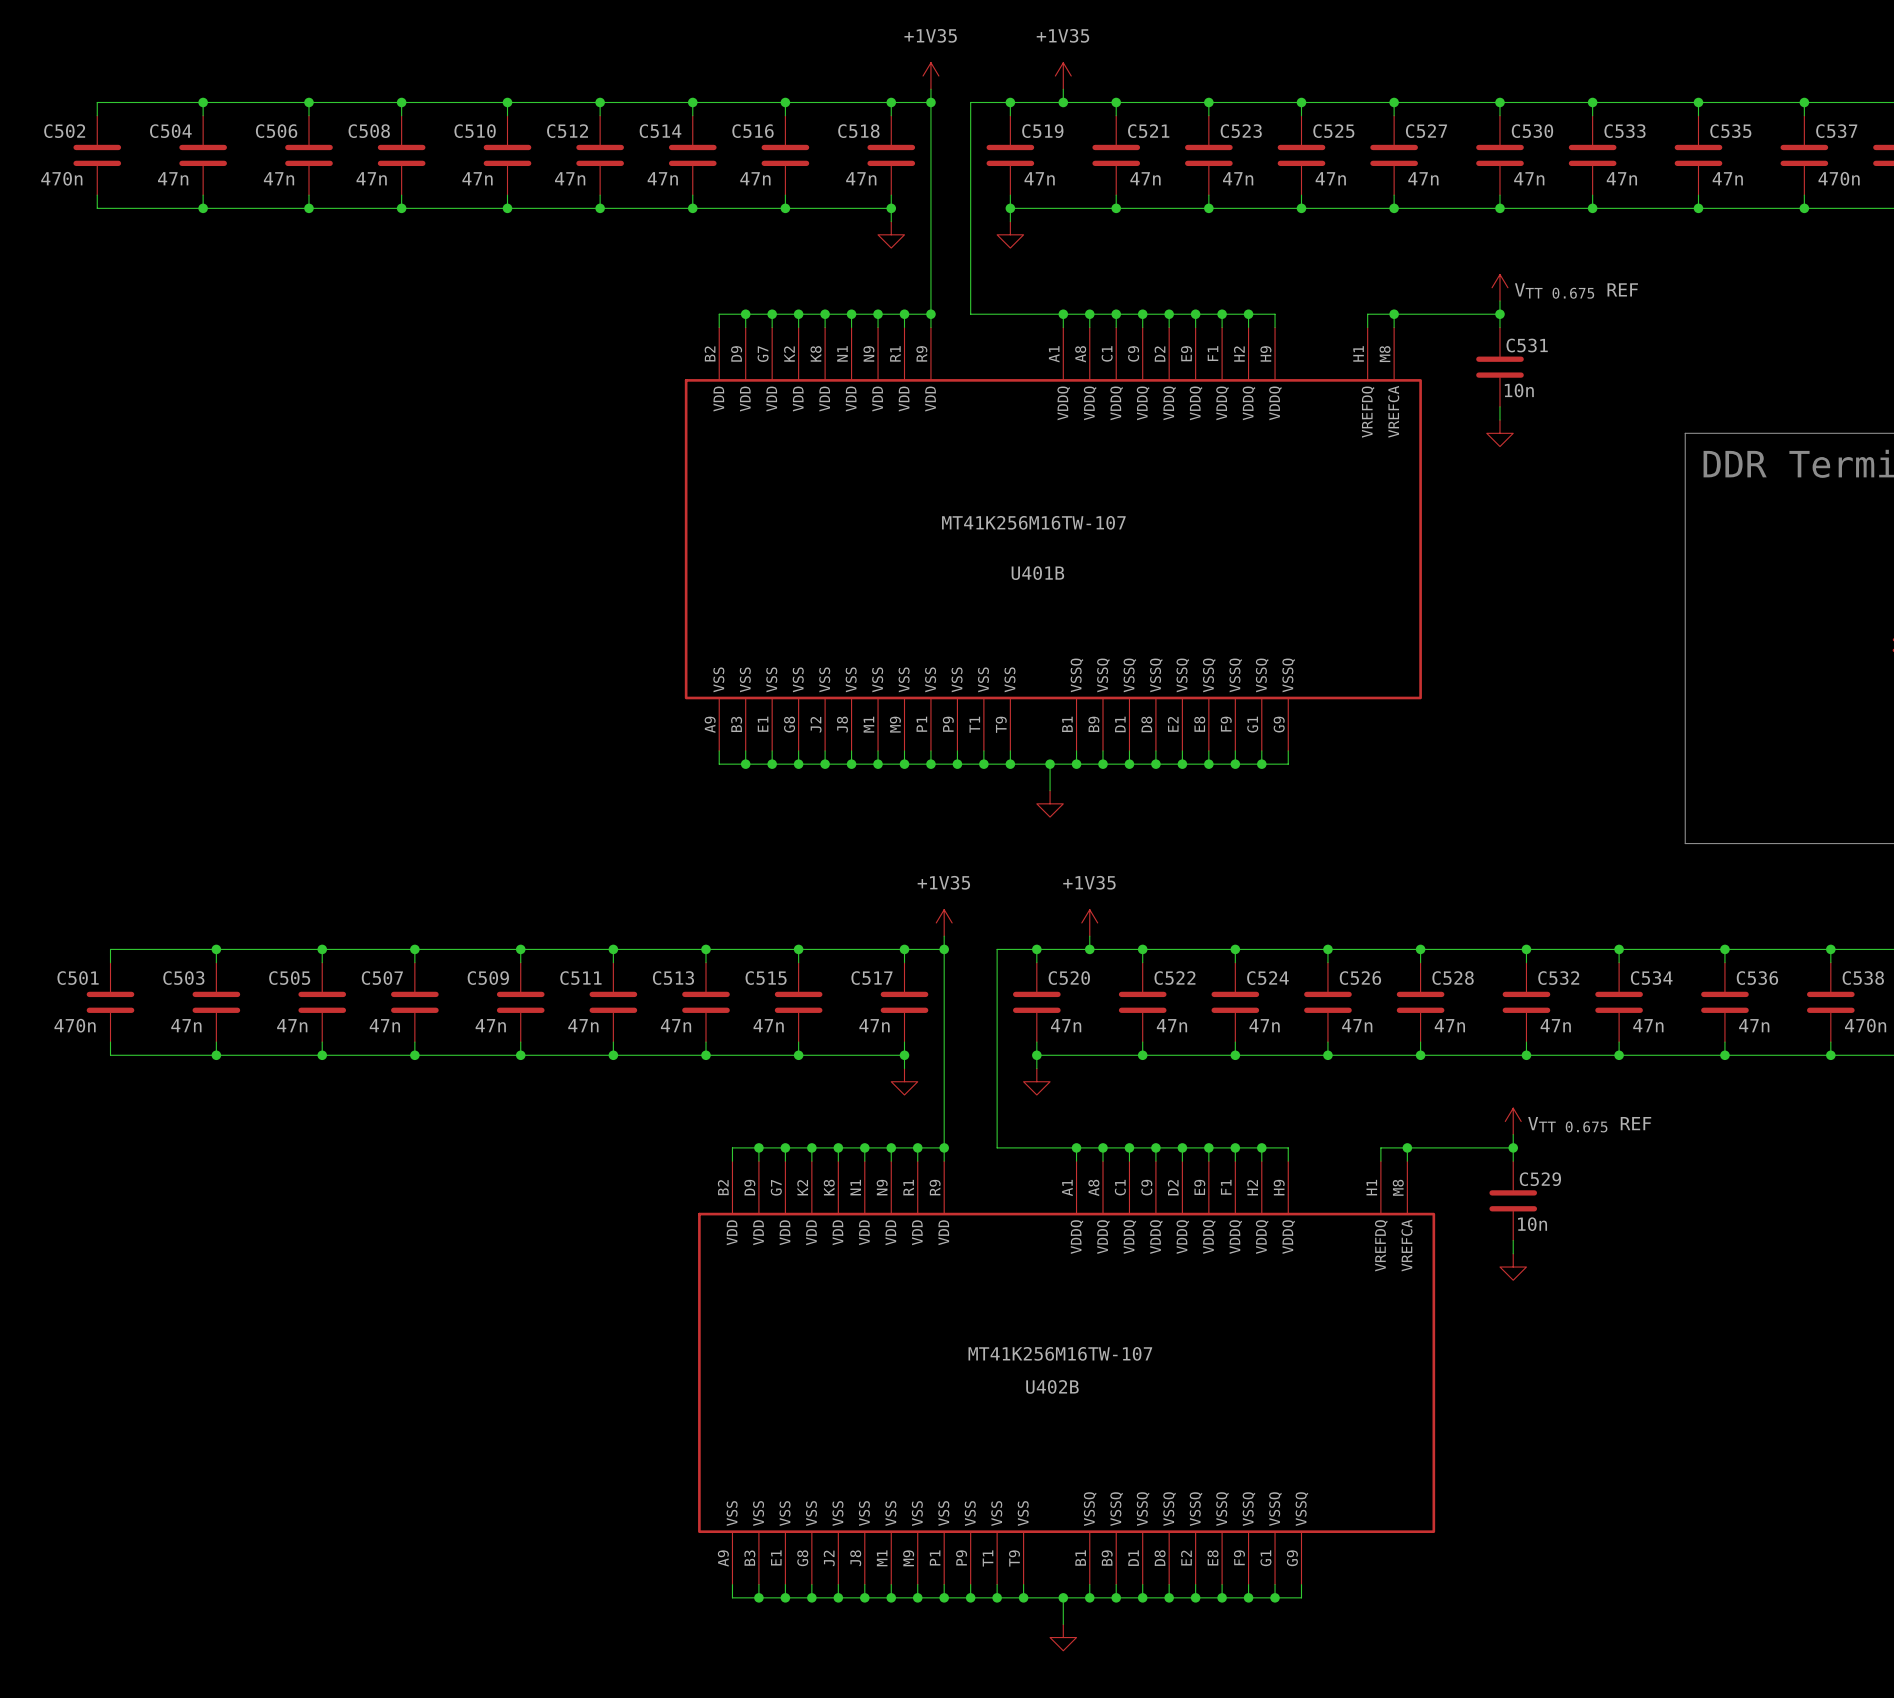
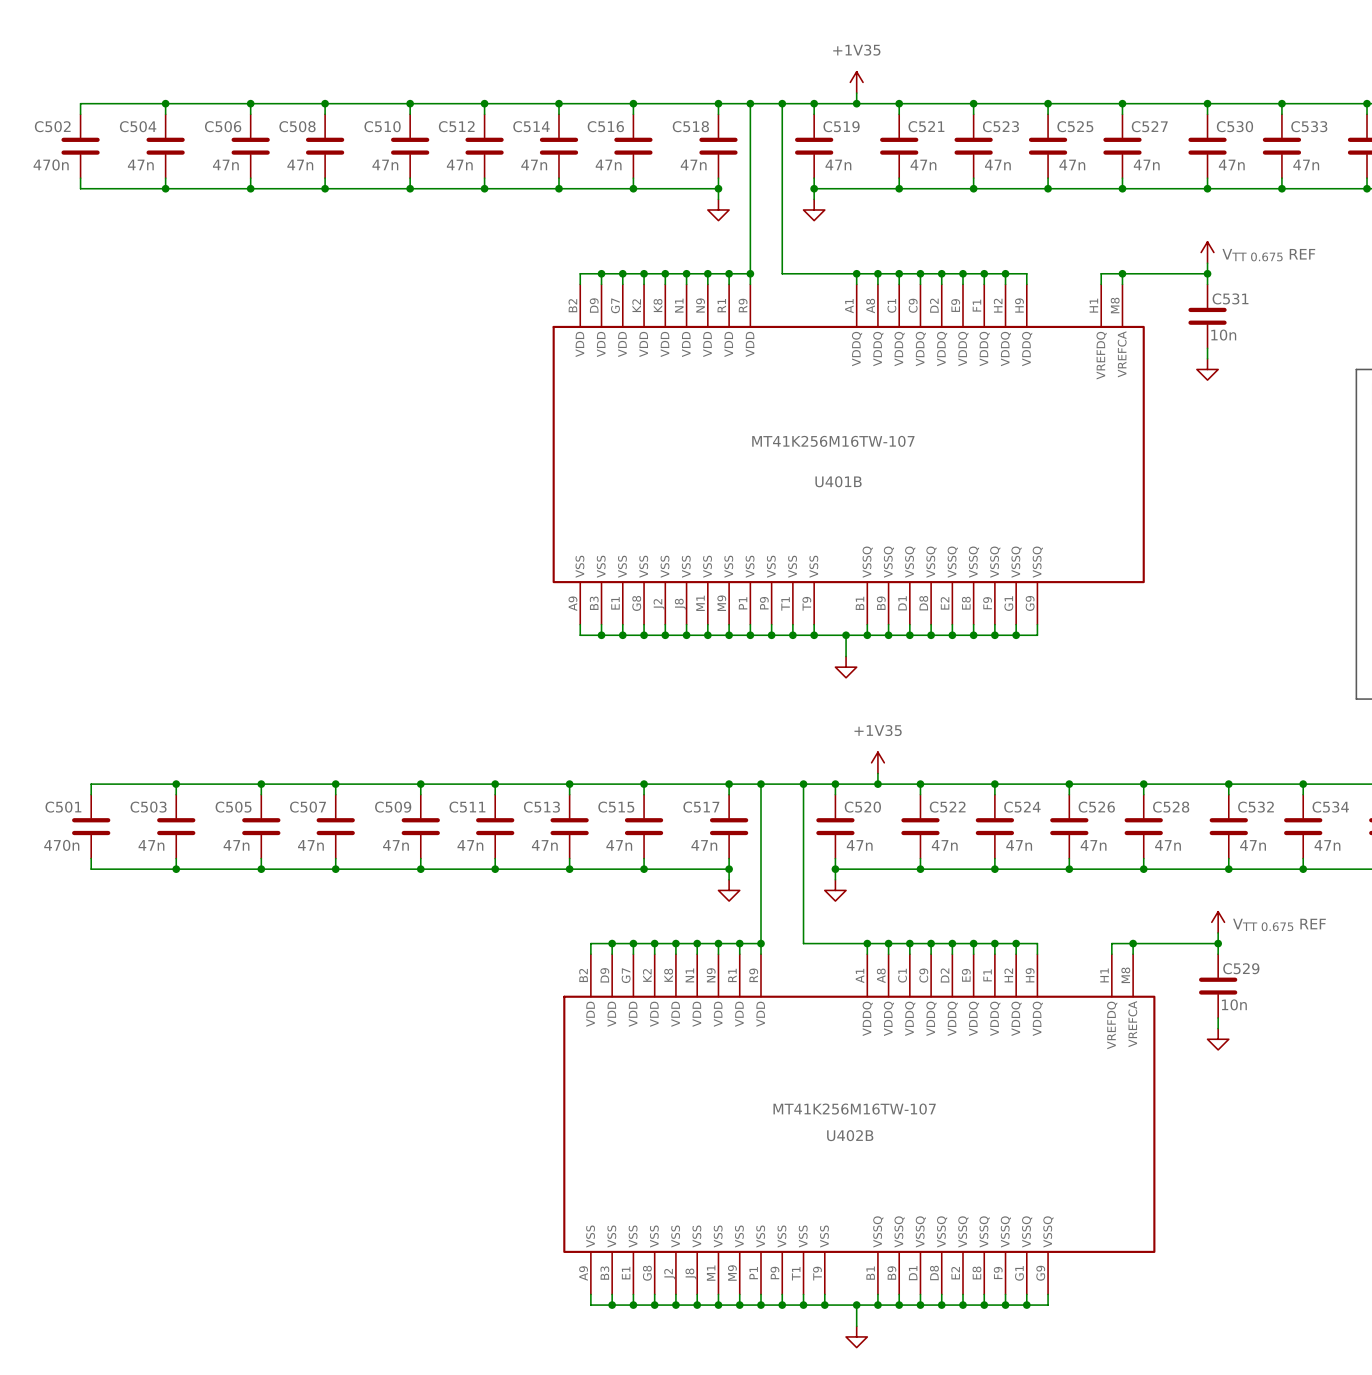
power symbol: +1V35 (930, 76) -> none
wire: (930, 89) (930, 102) -> (782, 103) (750, 103)
junction: none -> (782, 103)
power symbol: +1V35 (944, 922) -> none
wire: (944, 936) (944, 949) -> (803, 784) (760, 784)
junction: none -> (803, 784)

